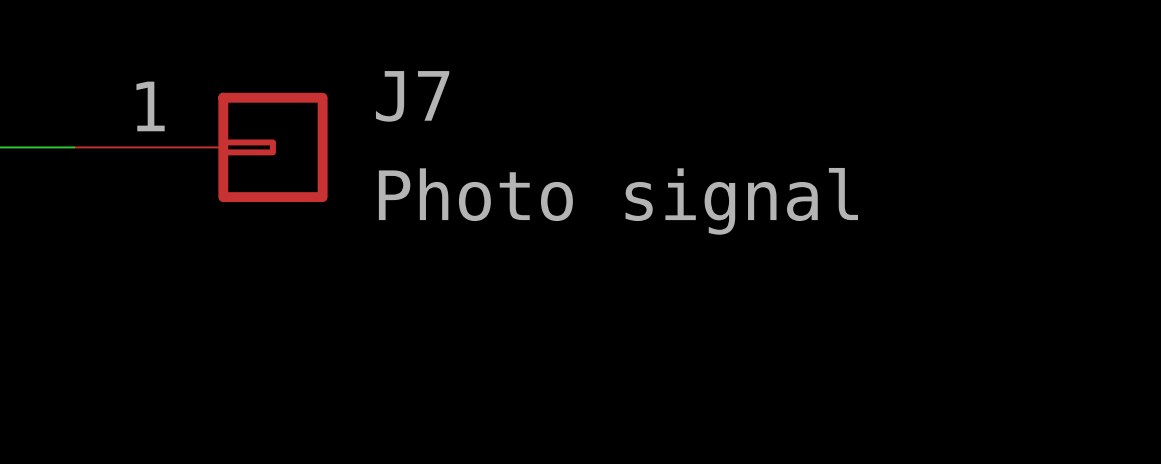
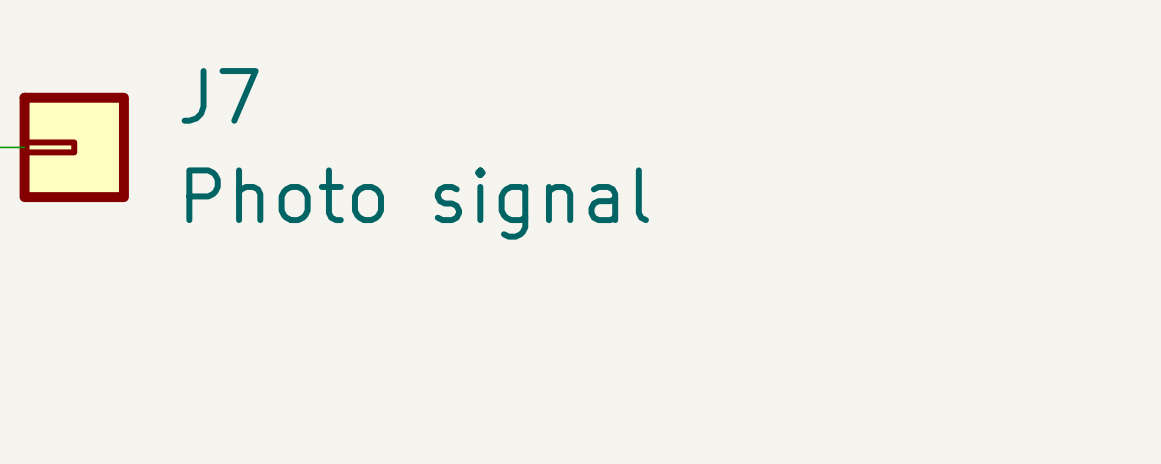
J7 symbol: [74, 92, 328, 203] -> [19, 92, 129, 203]

